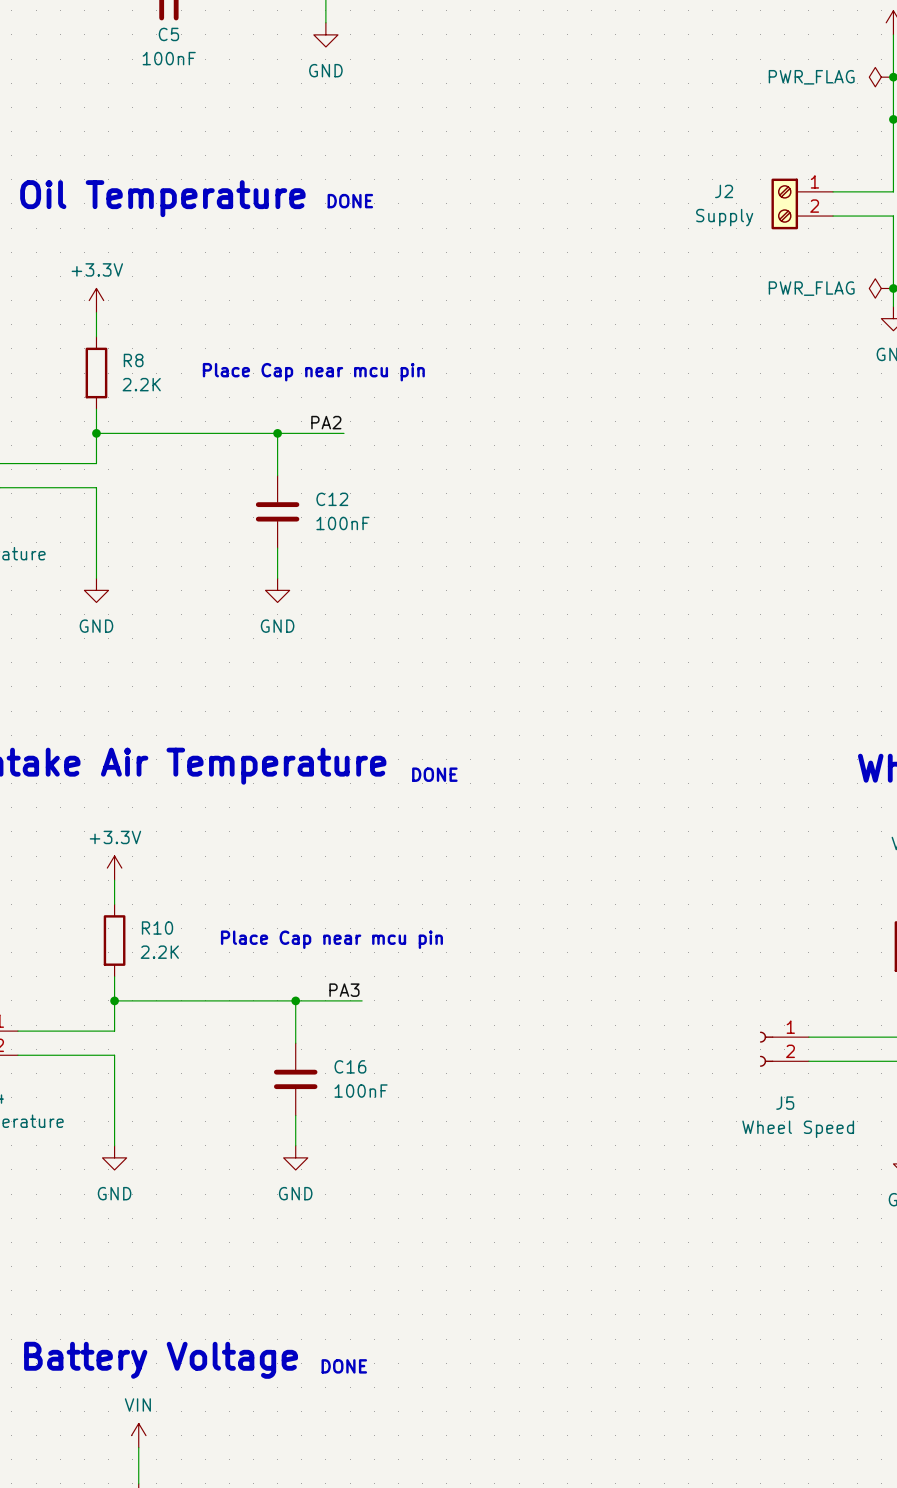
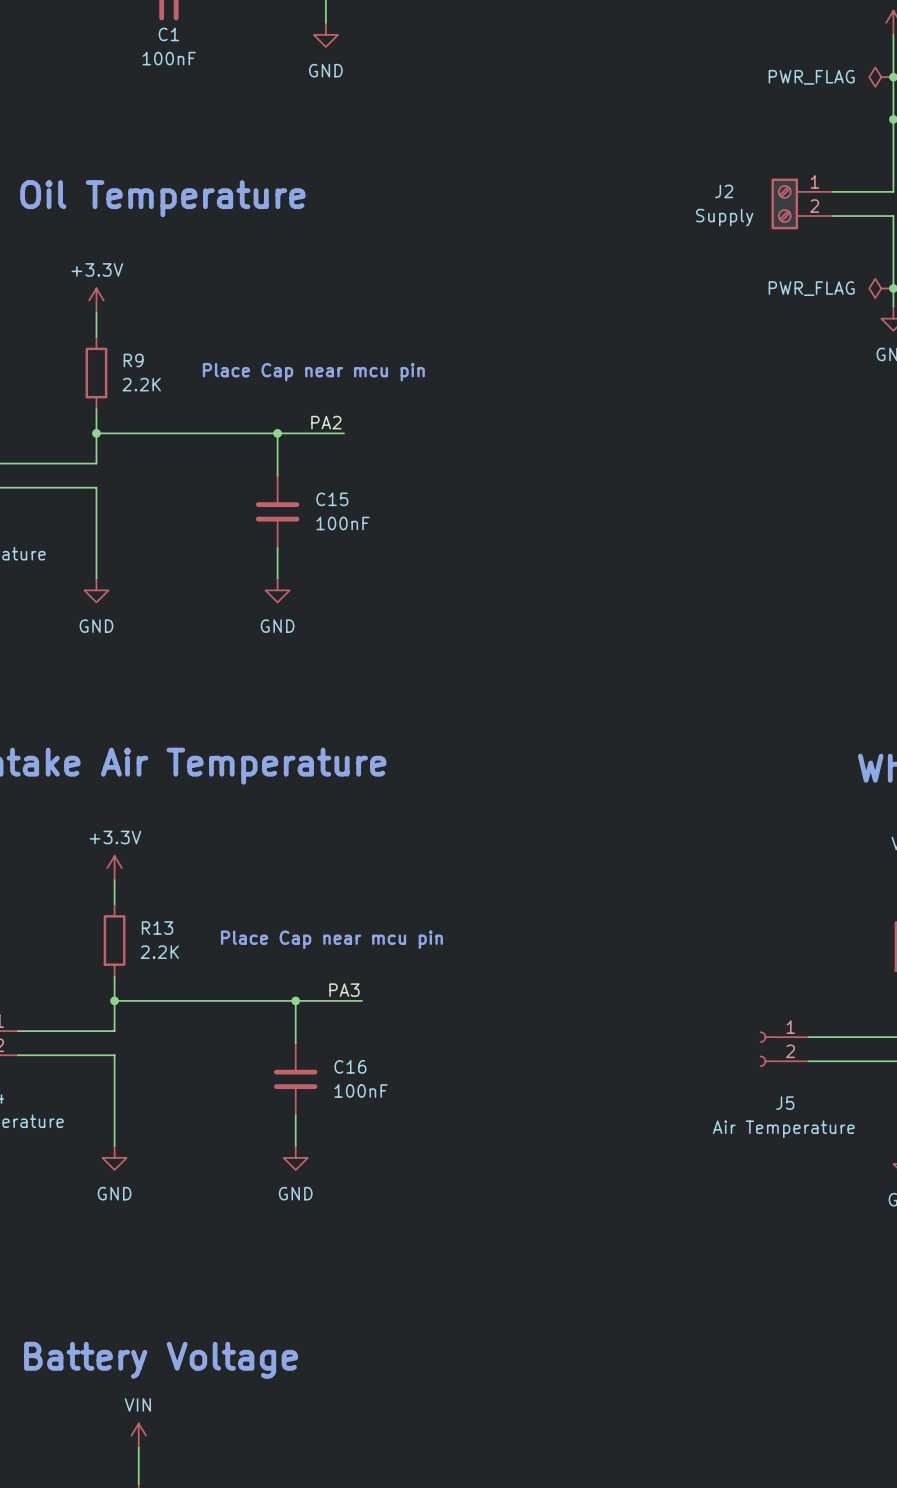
C5 name: C5 (168, 34) -> C1 (168, 34)
text: DONE (350, 201) -> none
R8 name: R8 (133, 360) -> R9 (133, 360)
C12 name: C12 (332, 499) -> C15 (332, 499)
text: DONE (434, 774) -> none
R10 name: R10 (157, 928) -> R13 (157, 928)
J5 value: Wheel Speed (798, 1129) -> Air Temperature (783, 1129)
text: DONE (344, 1366) -> none

